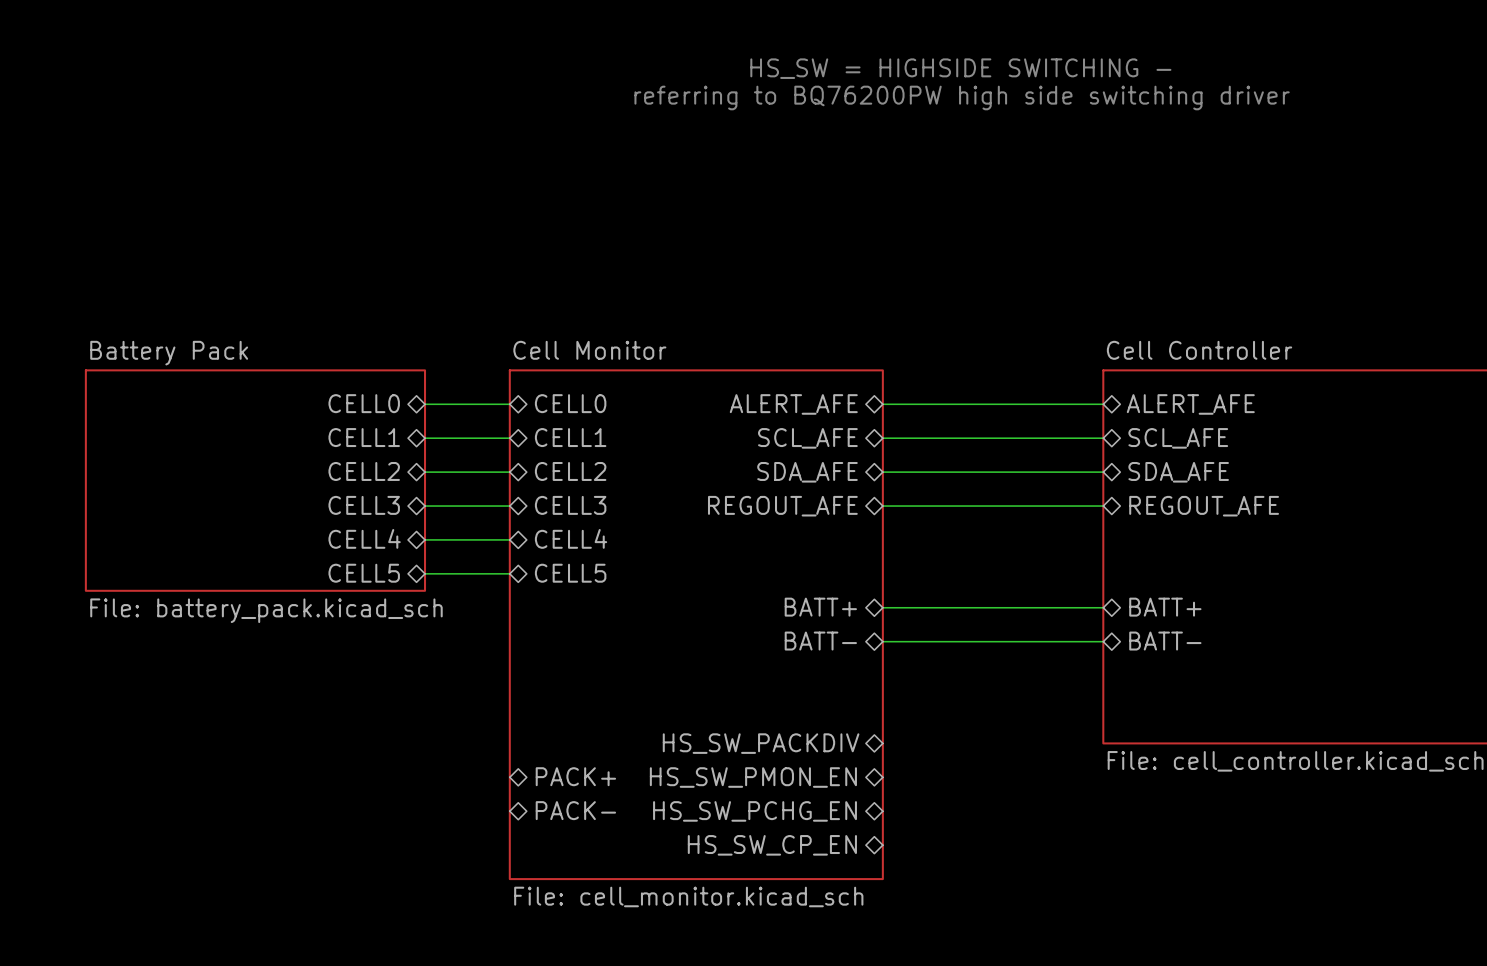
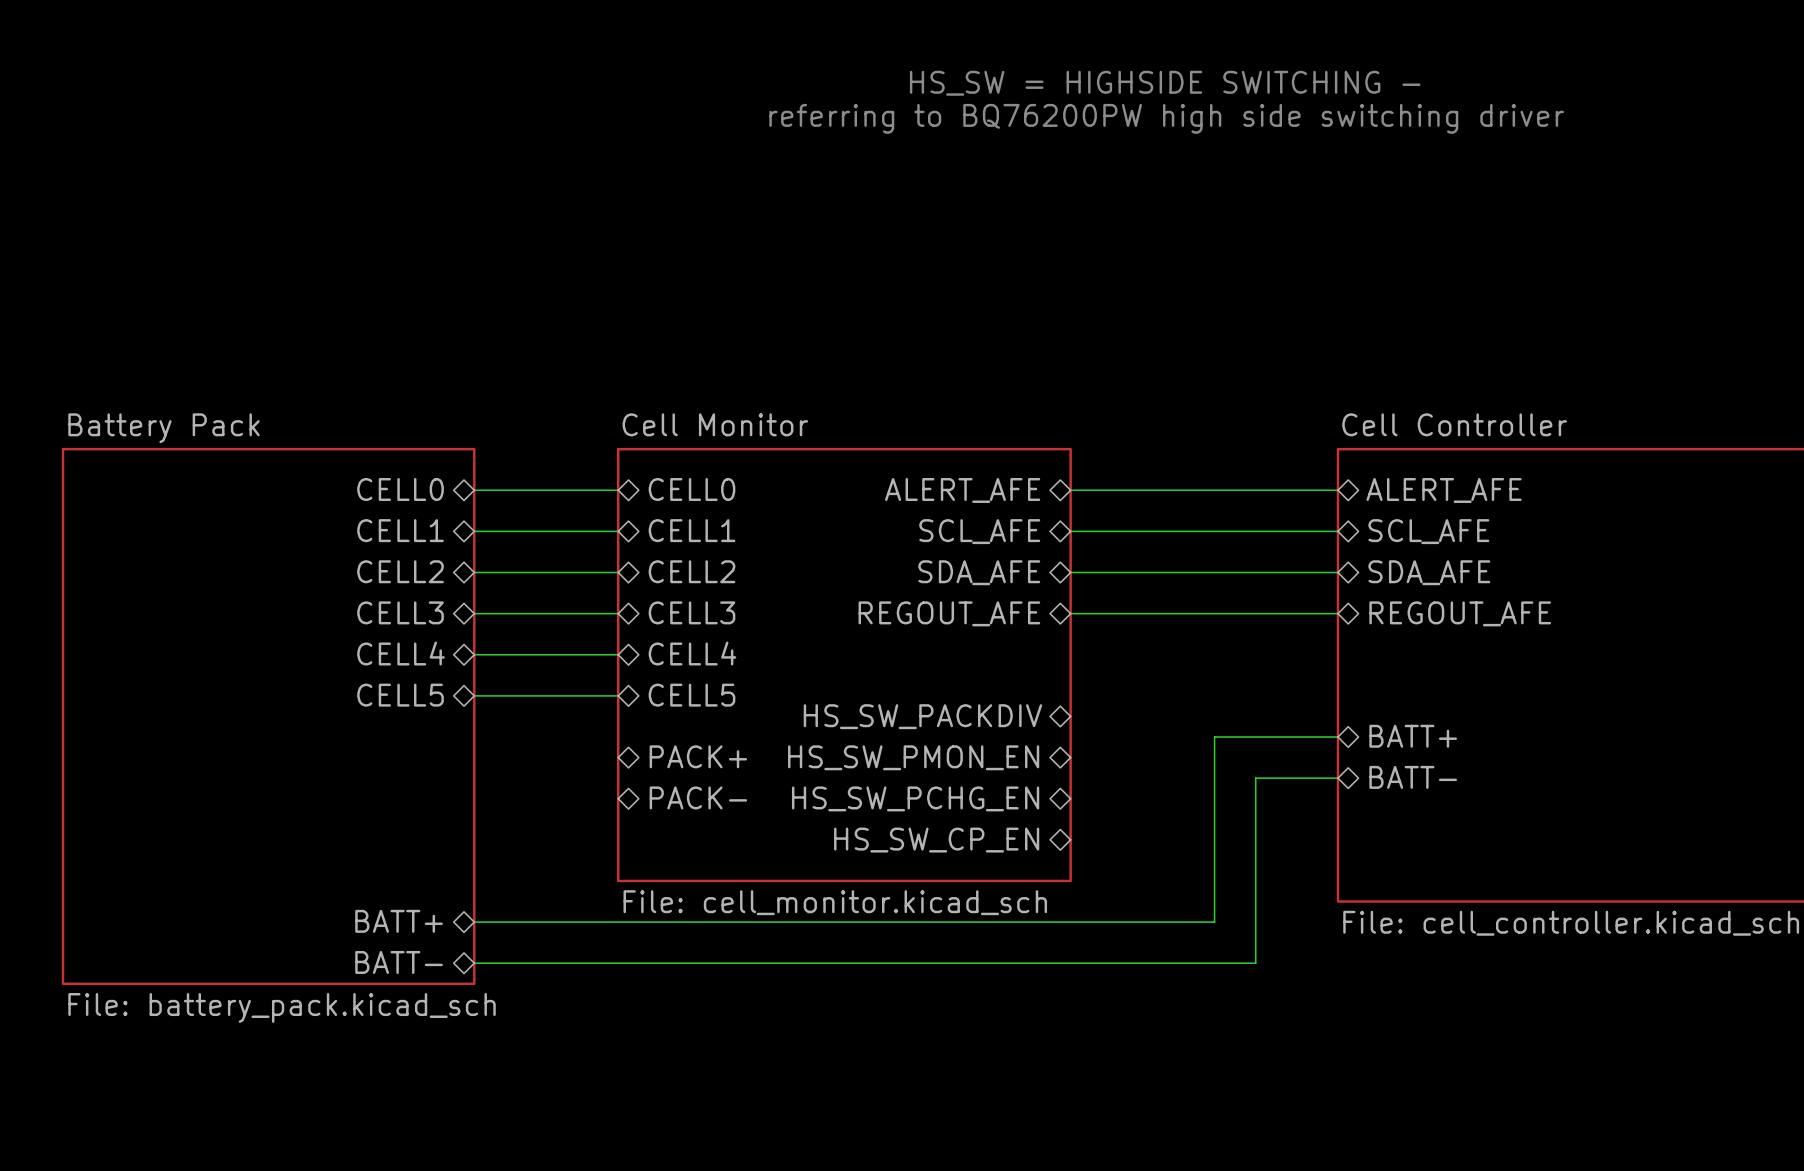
sheet pin position: CELL0 (364, 403) -> CELL0 (400, 489)
wire: none -> (474, 490) (515, 490)
sheet pin position: CELL1 (364, 437) -> CELL1 (400, 530)
wire: none -> (474, 531) (515, 531)
sheet pin position: CELL2 (364, 471) -> CELL2 (400, 571)
wire: none -> (474, 572) (515, 572)
sheet Battery Pack: File: battery_pack.kicad_sch (255, 480) -> none
sheet pin position: CELL3 (364, 505) -> CELL3 (400, 612)
wire: none -> (474, 613) (515, 613)
sheet pin position: CELL4 (364, 538) -> CELL4 (401, 653)
wire: none -> (474, 654) (515, 654)
sheet Cell Monitor: none -> File: cell_monitor.kicad_sch (844, 665)
sheet pin position: CELL5 (364, 573) -> CELL5 (400, 695)
wire: none -> (474, 695) (515, 695)
sheet Battery Pack: none -> File: battery_pack.kicad_sch (268, 716)
sheet pin: BATT+ (820, 607) -> none
wire: (882, 607) (1001, 607) -> (474, 922) (1214, 922) (1214, 737)
sheet Cell Monitor: File: cell_monitor.kicad_sch (696, 624) -> none
sheet pin: BATT- (820, 641) -> none
wire: (882, 641) (1035, 641) -> (474, 963) (1255, 963) (1255, 778)
sheet pin position: HS_SW_PACKDIV (761, 743) -> HS_SW_PACKDIV (922, 716)
sheet pin: none -> BATT+ (399, 921)
sheet pin position: PACK+ (575, 776) -> PACK+ (698, 756)
sheet pin position: HS_SW_PMON_EN (753, 777) -> HS_SW_PMON_EN (913, 757)
sheet pin: none -> BATT- (399, 962)
sheet pin position: PACK- (575, 810) -> PACK- (698, 797)
sheet pin position: HS_SW_PCHG_EN (755, 811) -> HS_SW_PCHG_EN (915, 798)
sheet pin position: HS_SW_CP_EN (772, 845) -> HS_SW_CP_EN (936, 840)

